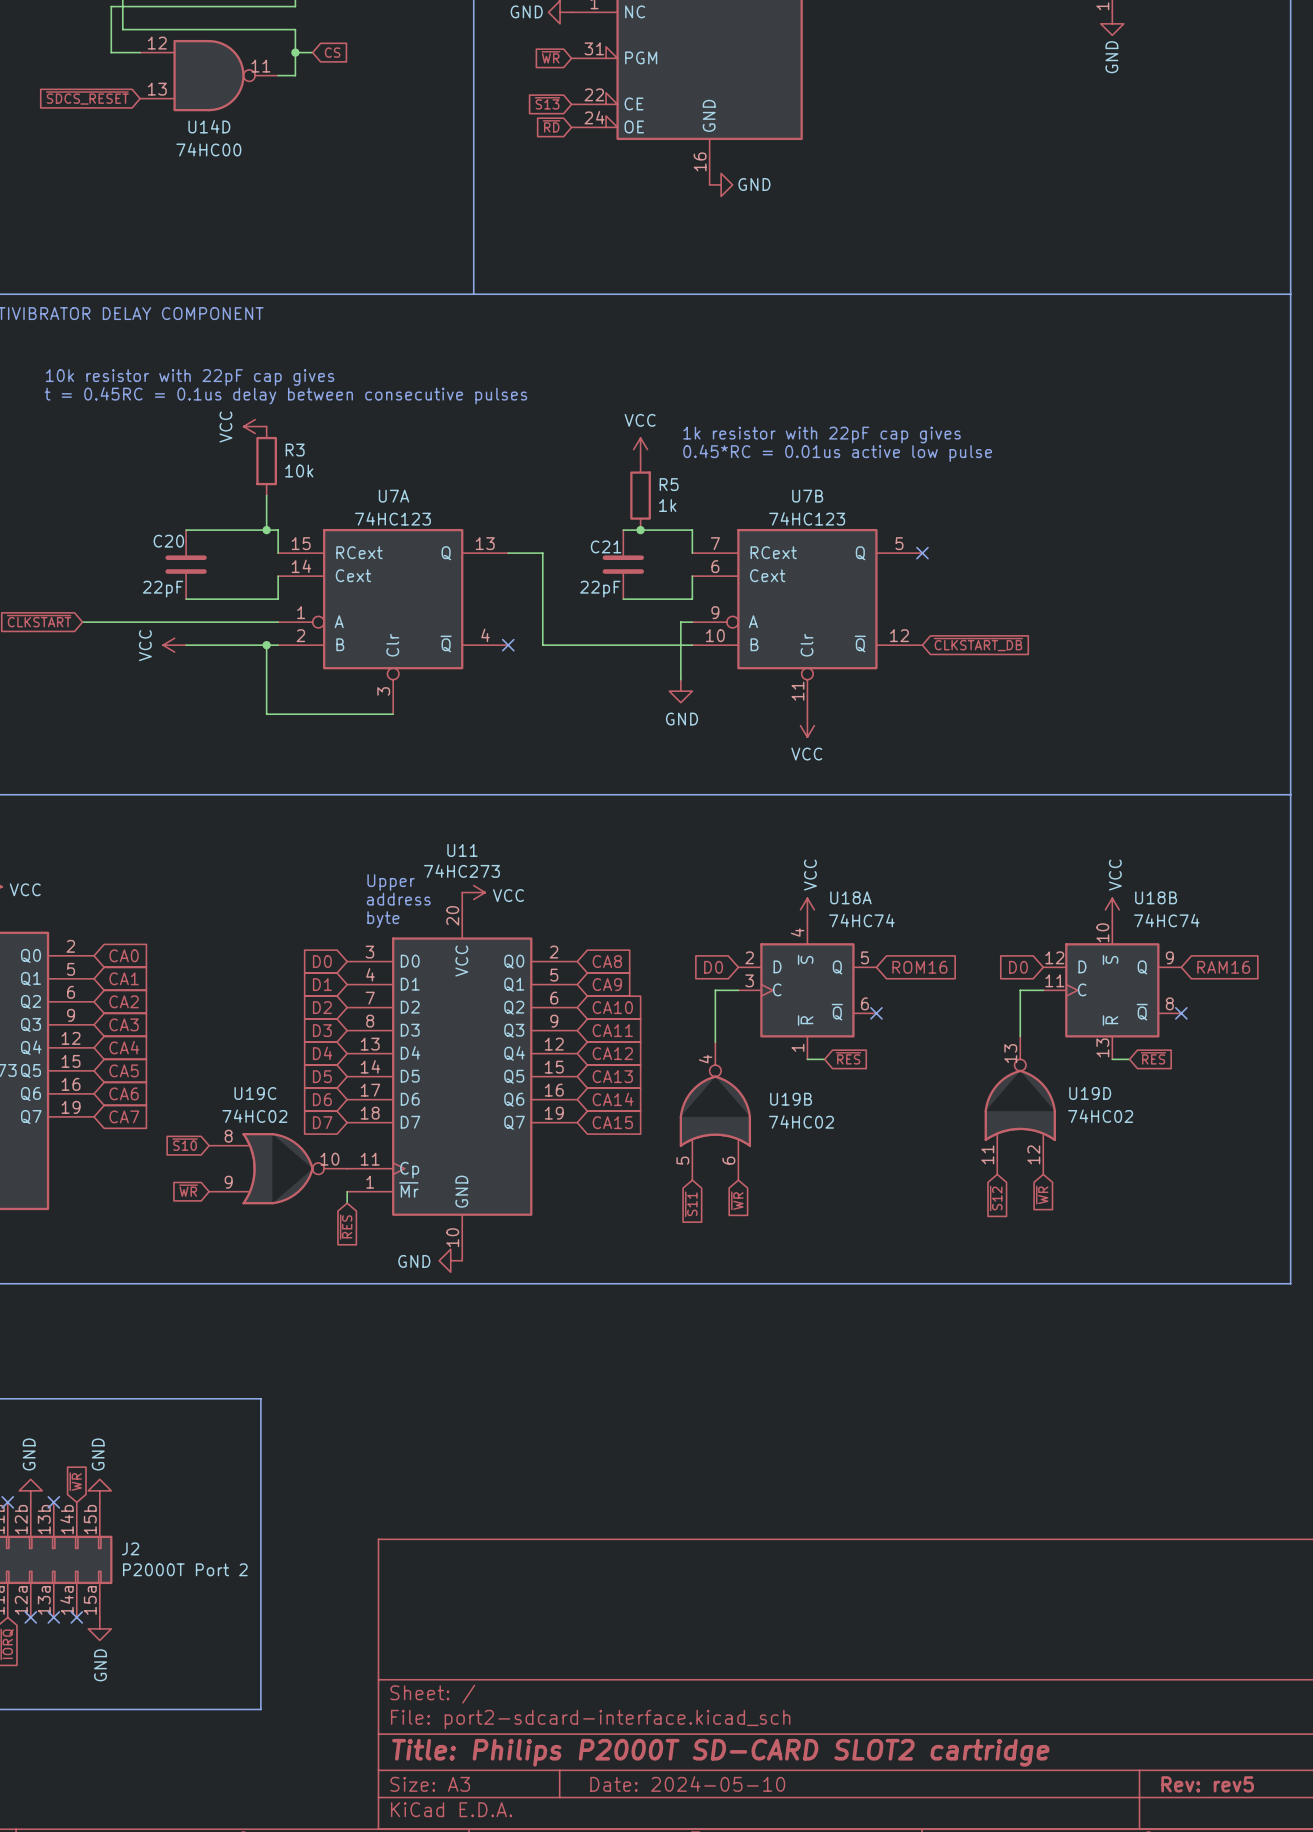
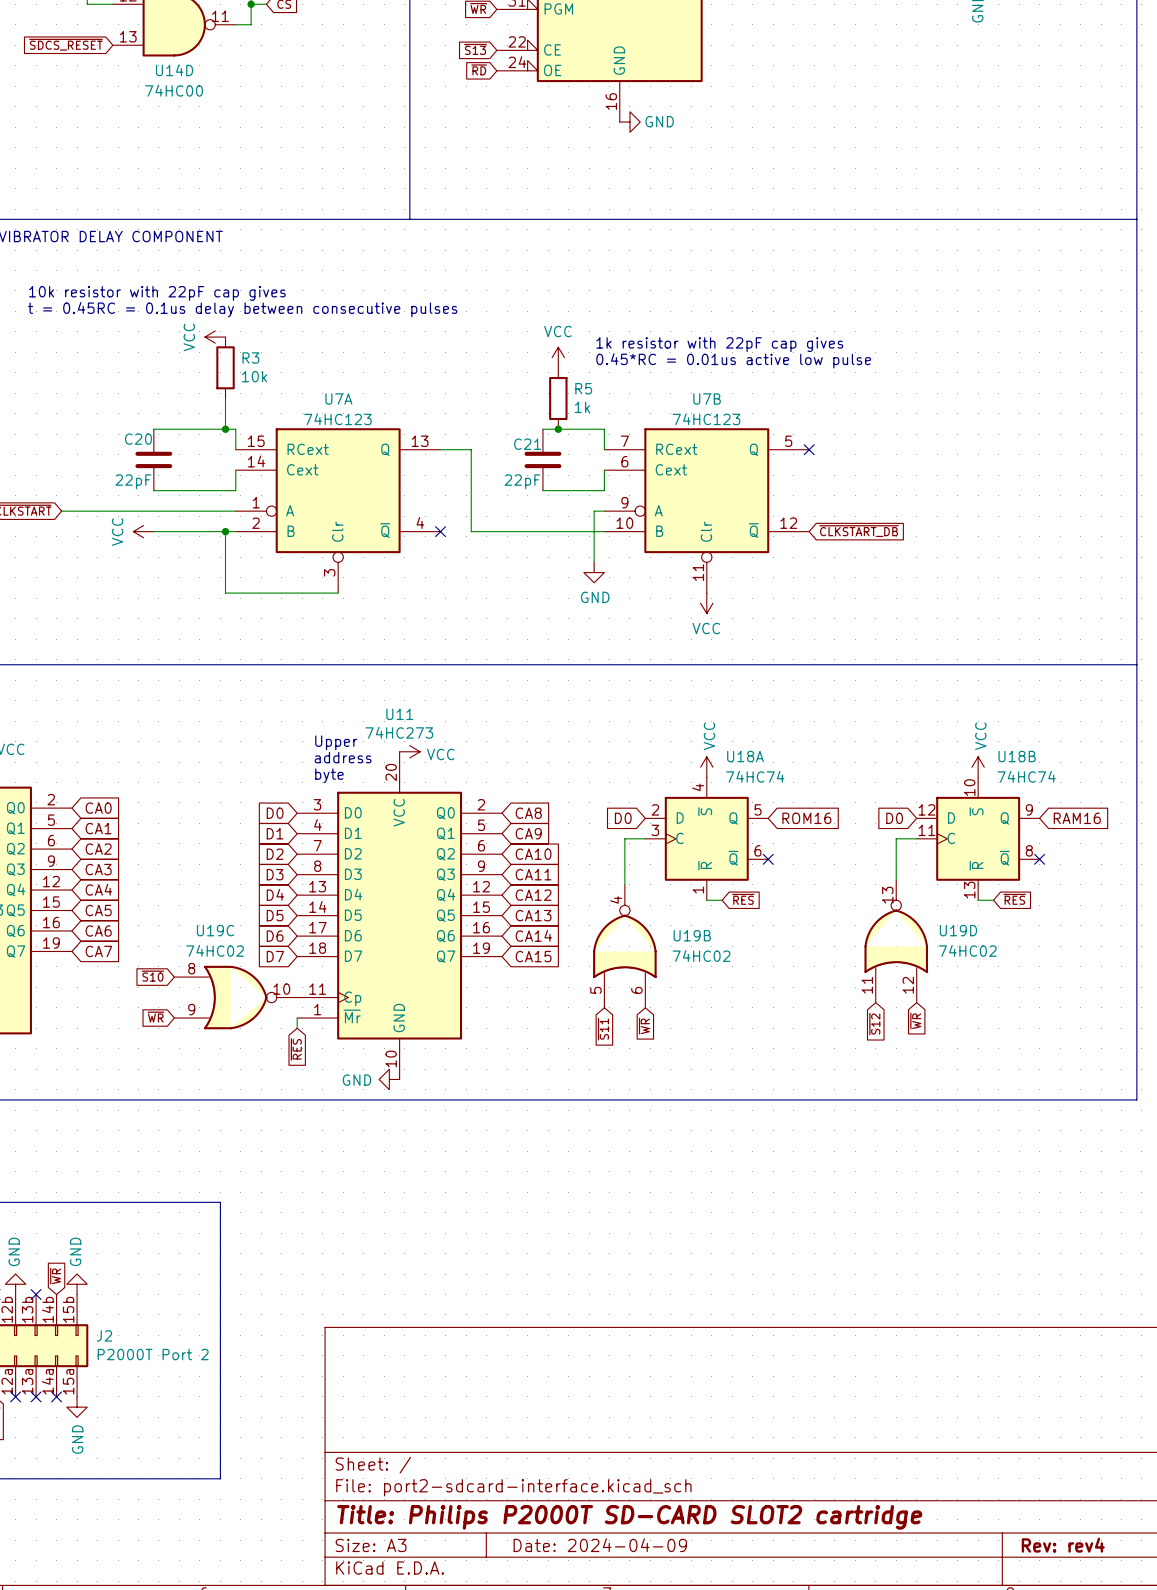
title block: Date: 2024-05-10 (687, 1784) -> Date: 2024-04-09 (600, 1545)
title block: Rev: rev5 (1207, 1784) -> Rev: rev4 (1063, 1545)

